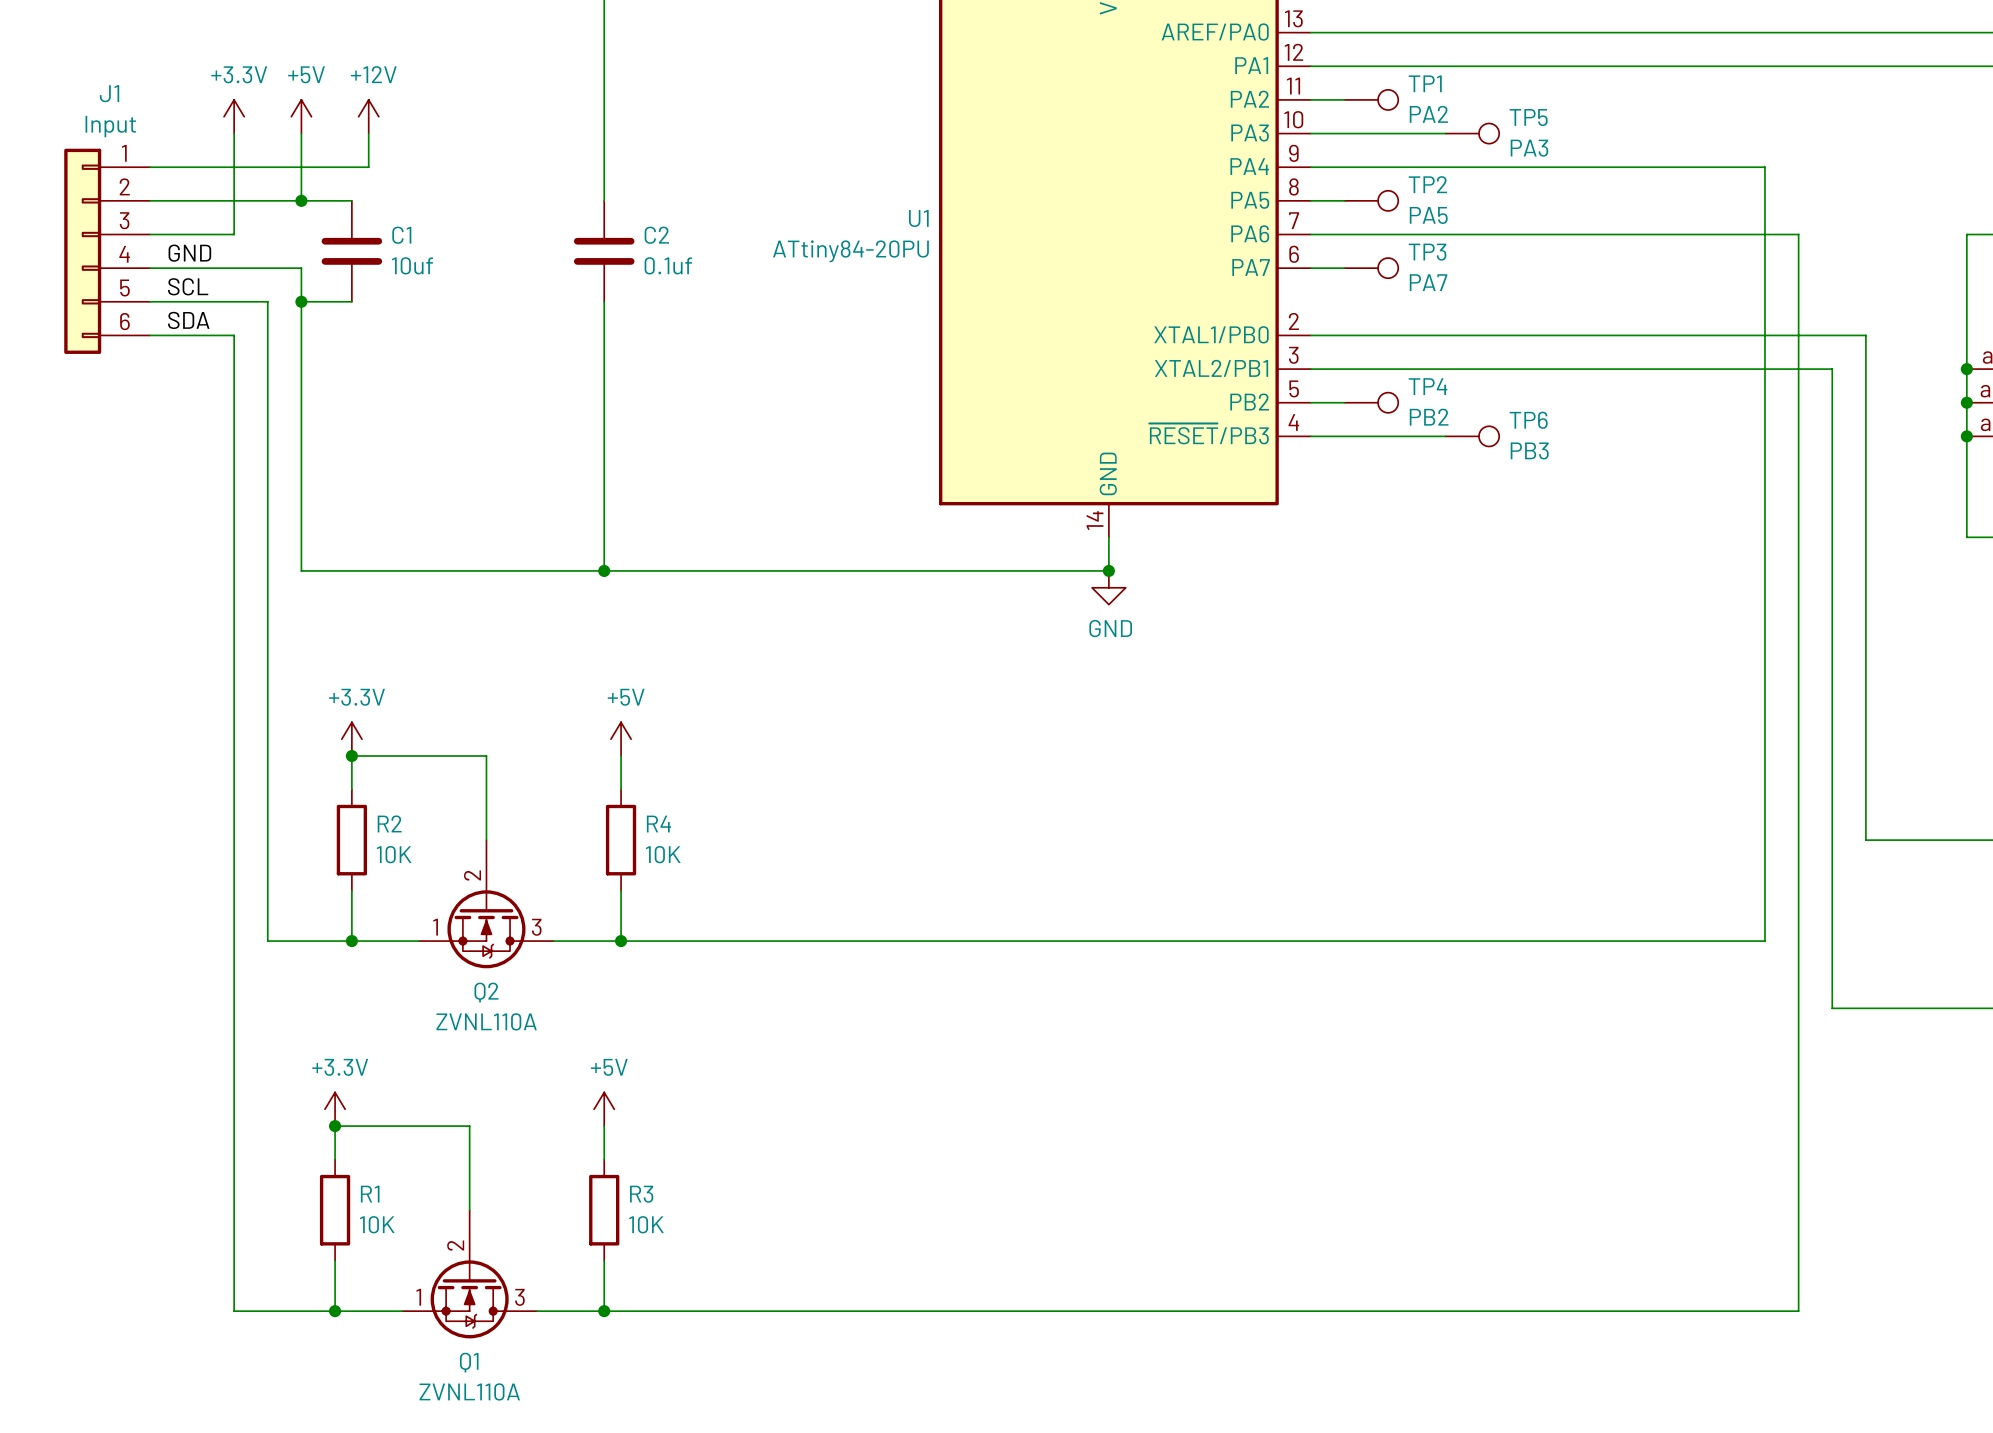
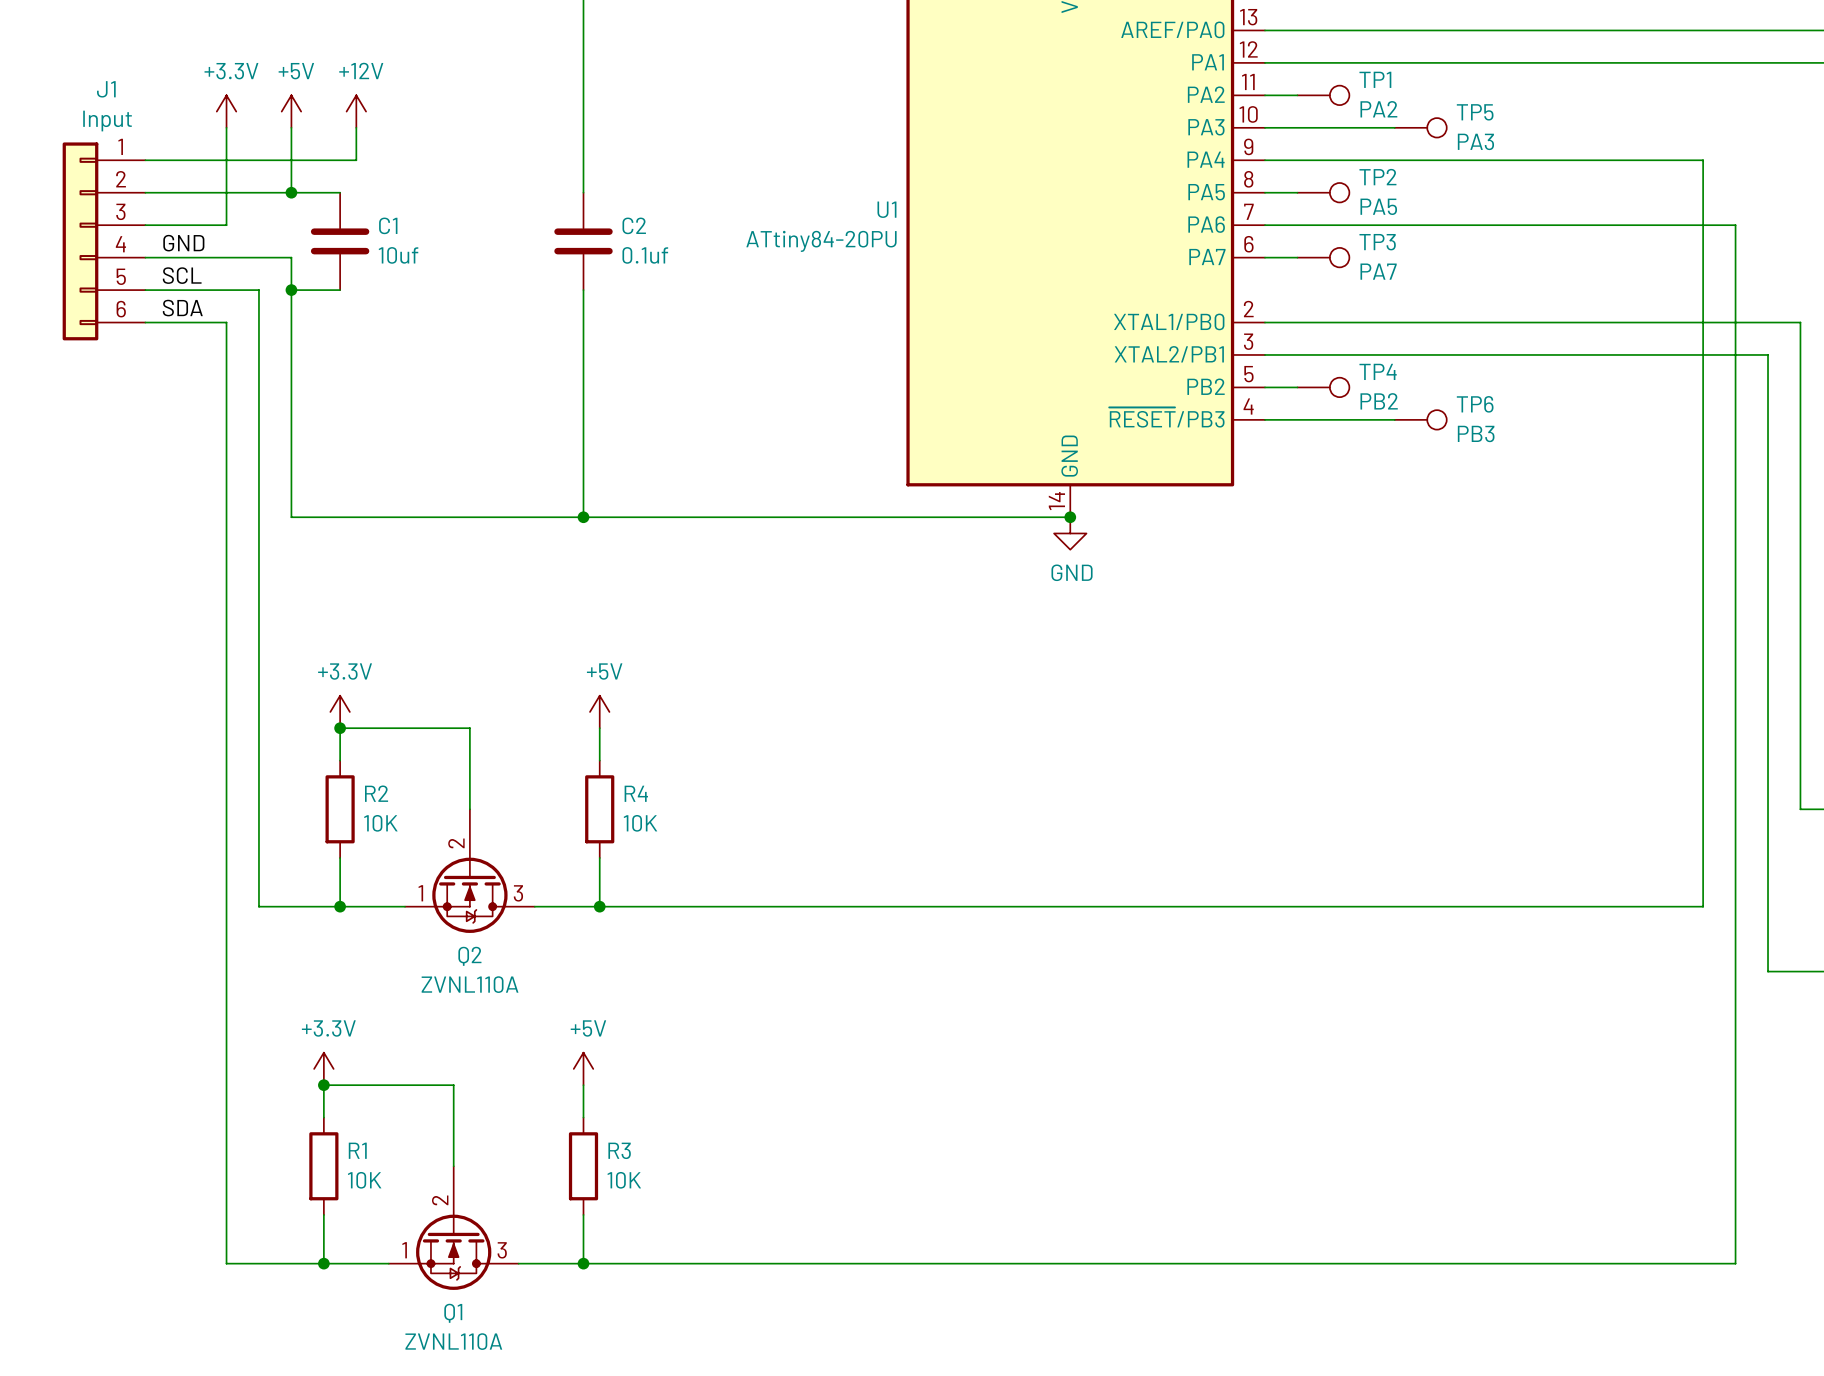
wire: (301, 537) (301, 570) (1108, 570) (1108, 537) -> (291, 517) (1070, 517)
wire: (604, 537) (604, 570) -> none
junction position: (604, 570) -> (583, 517)
junction position: (1108, 570) -> (1070, 517)
power symbol position: GND (1108, 587) -> GND (1070, 533)

